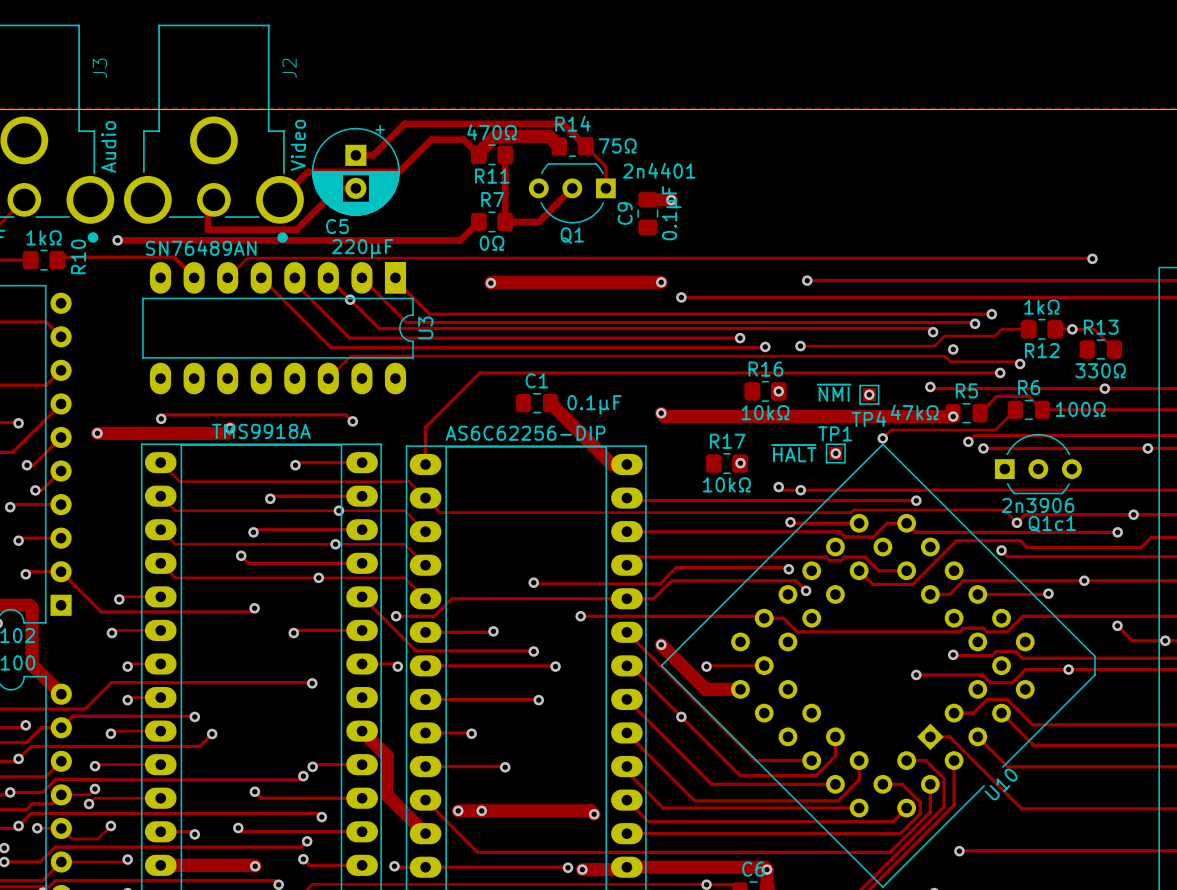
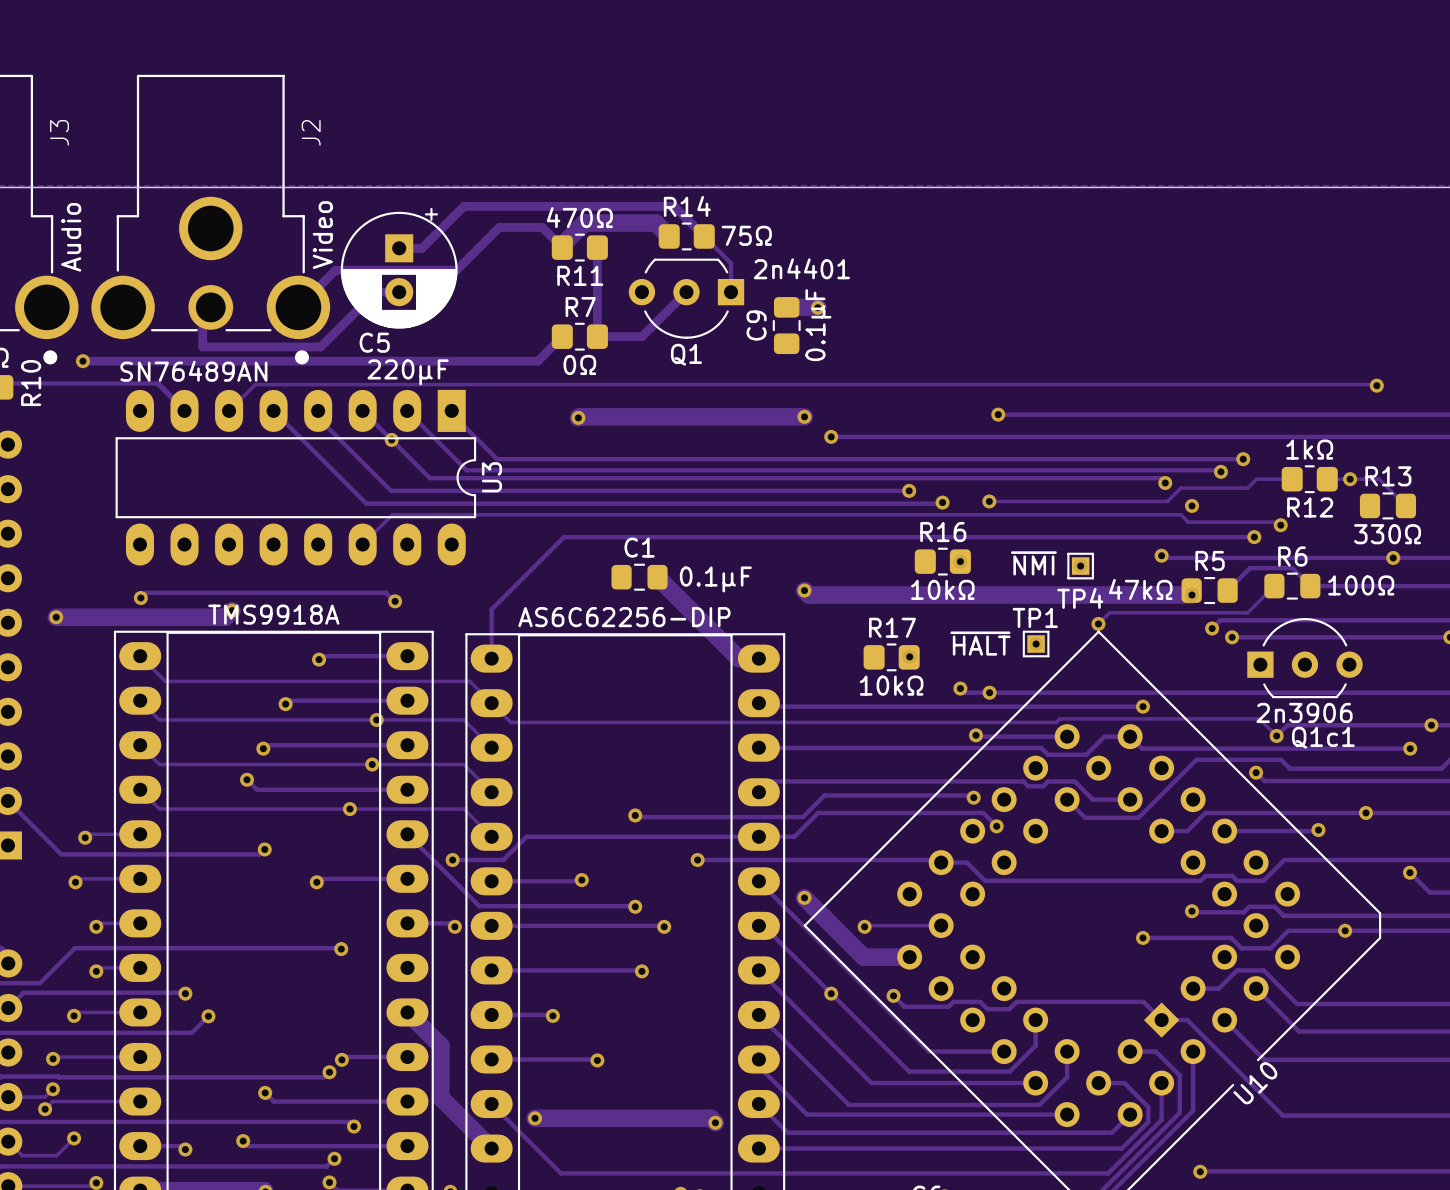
track: none -> (893, 995) (904, 1006) (948, 1006) (953, 1001) (980, 1001) (987, 1009) (1009, 1009) (1016, 1001) (1143, 1001) (1161, 1020)
via: none -> (893, 995)
via: (481, 810) -> none

